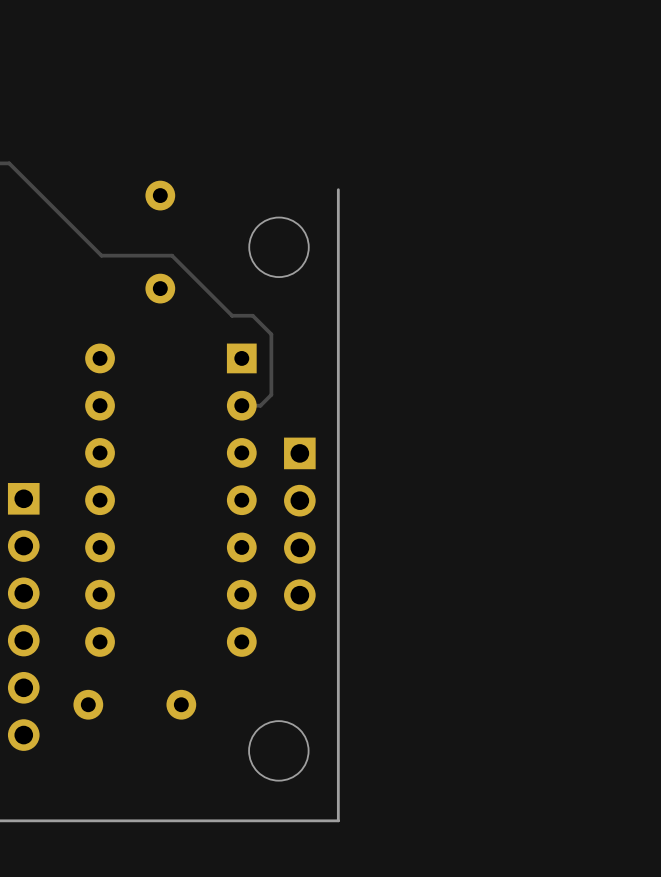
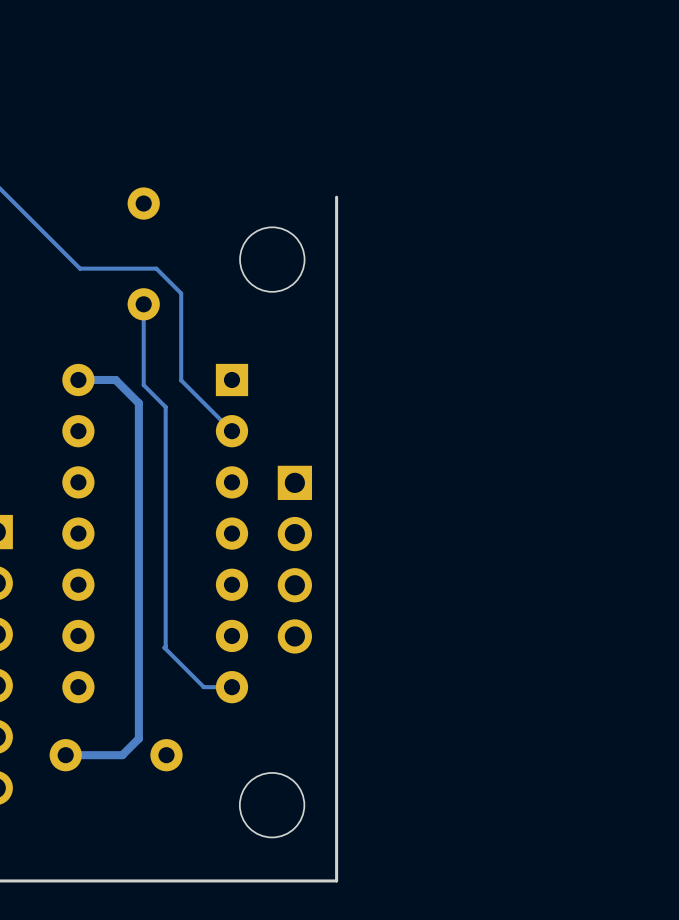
track: (194, 278) (232, 315) (252, 315) (271, 334) (271, 394) (260, 405) (241, 405) -> (181, 293) (181, 380) (231, 431)
track: none -> (143, 304) (143, 385) (165, 407) (164, 647) (203, 687) (231, 687)
track: none -> (78, 379) (115, 379) (138, 403) (138, 738) (122, 755) (65, 755)

